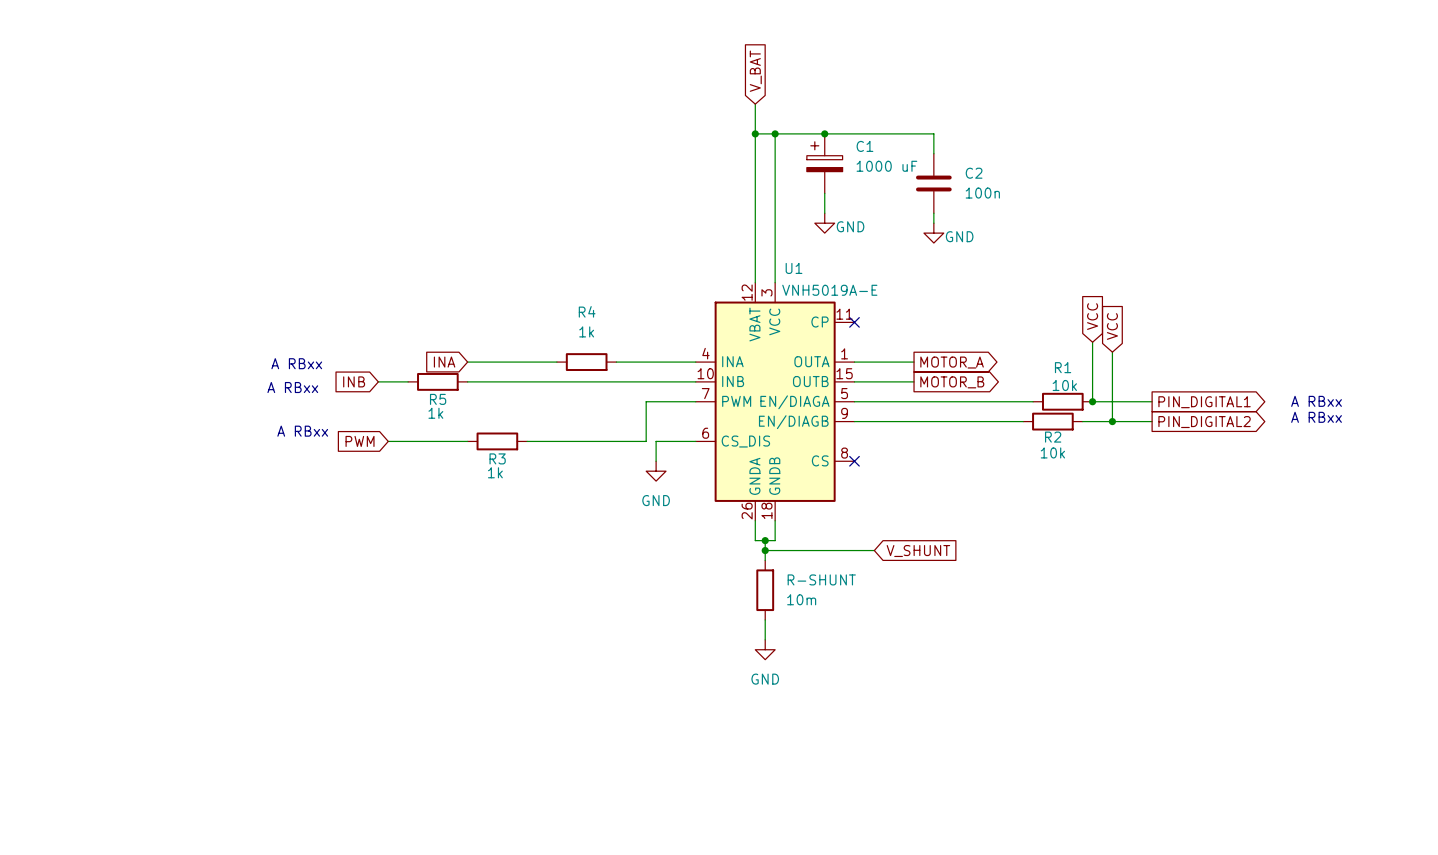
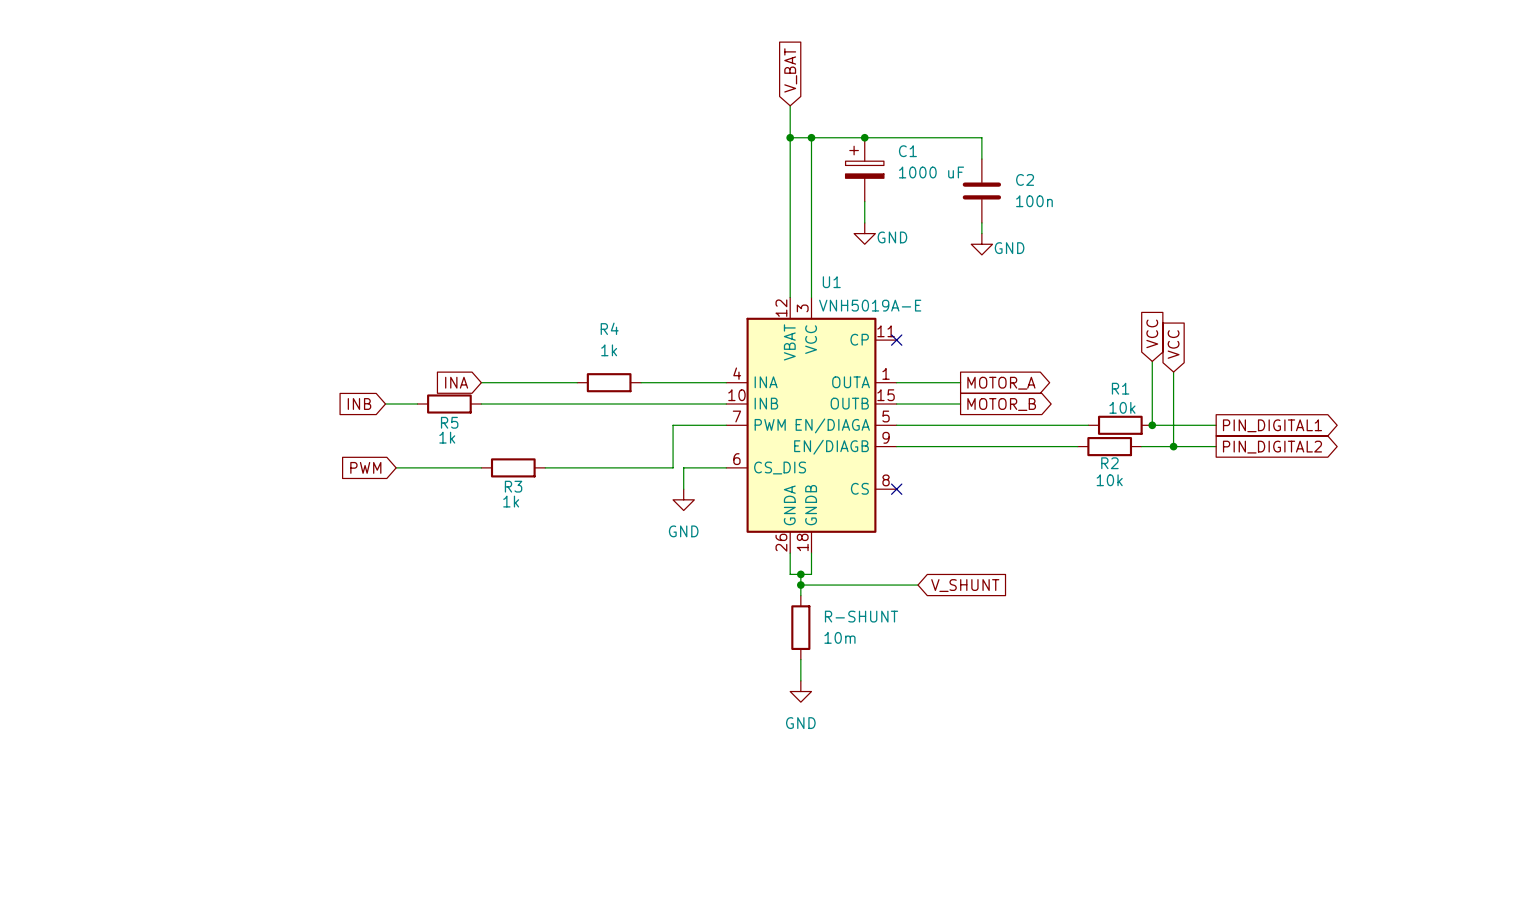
text: A RBxx (296, 363) -> none
text: A RBxx (292, 387) -> none
text: A RBxx (1316, 401) -> none
text: A RBxx (1316, 417) -> none
text: A RBxx (302, 431) -> none

